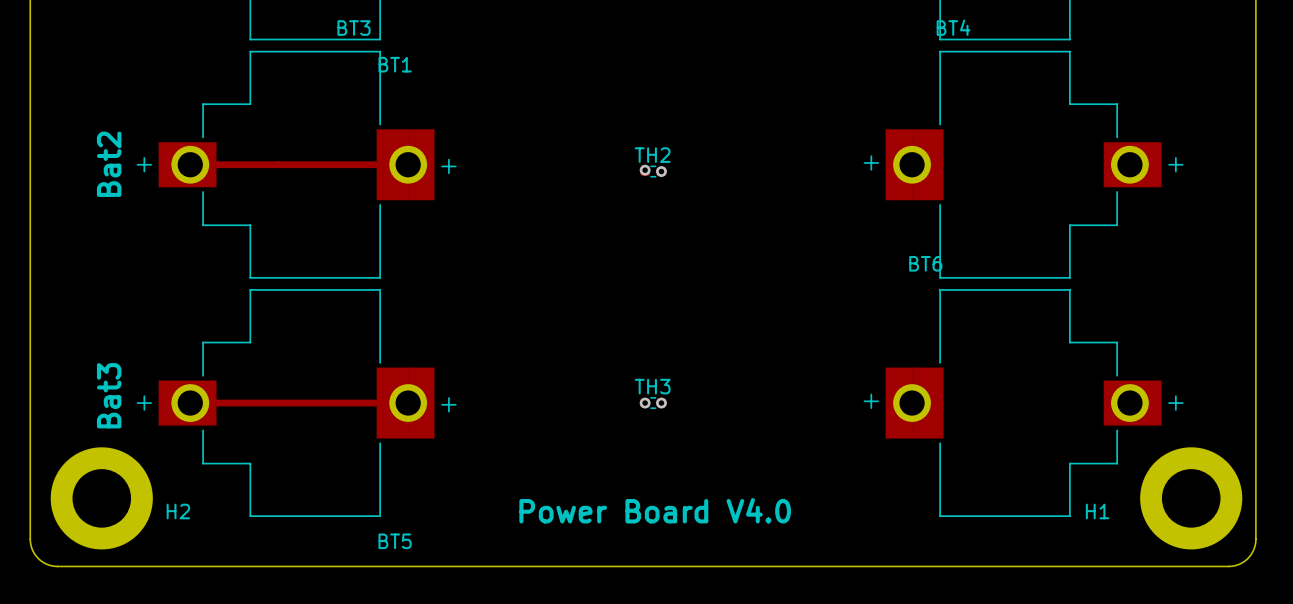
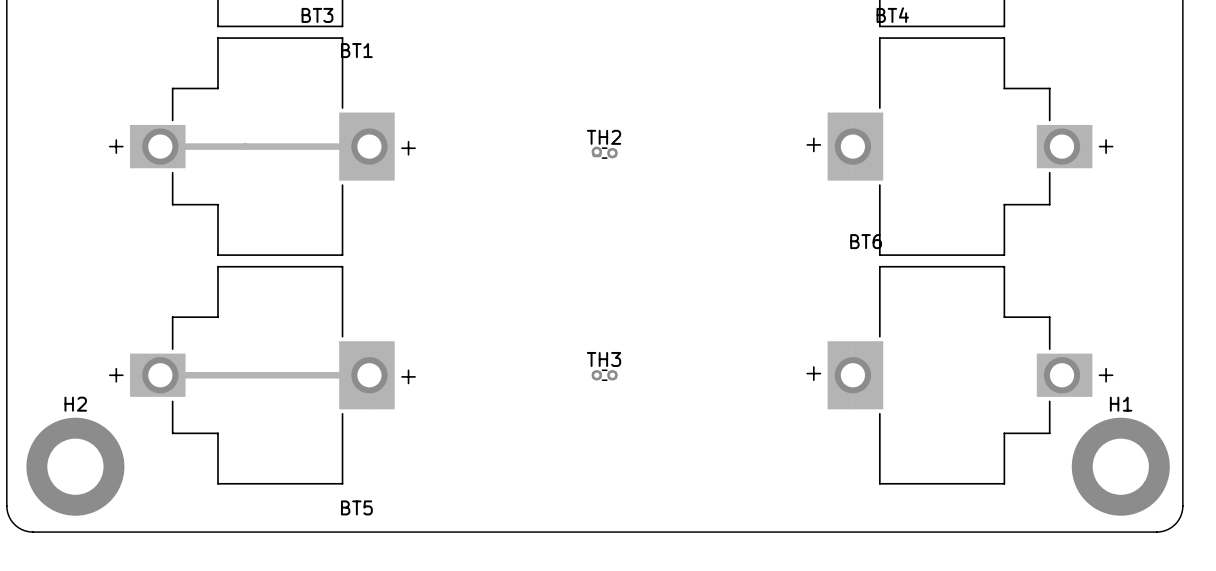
text: Bat2 (109, 164) -> none
text: Bat3 (109, 395) -> none
text: Power Board V4.0 (655, 510) -> none
H2 name position: H2 (178, 511) -> H2 (75, 404)
H1 name position: H1 (1097, 511) -> H1 (1121, 404)

